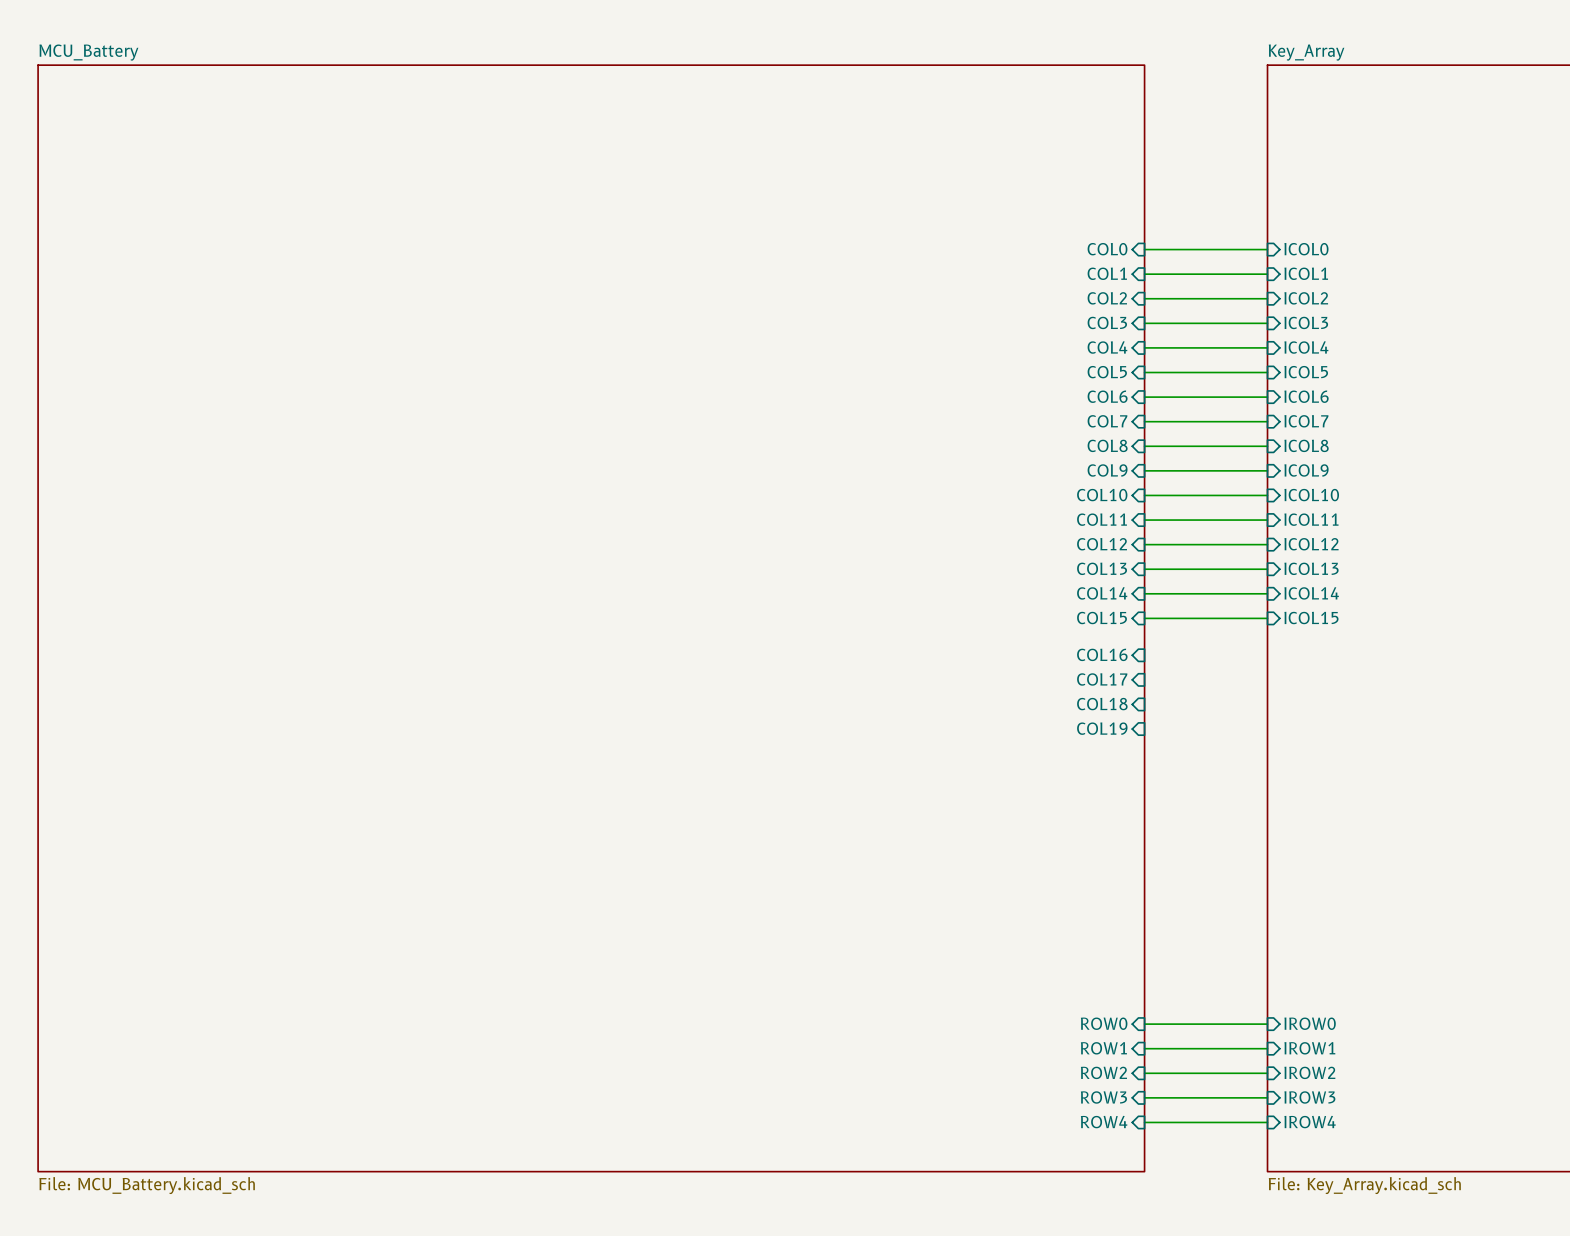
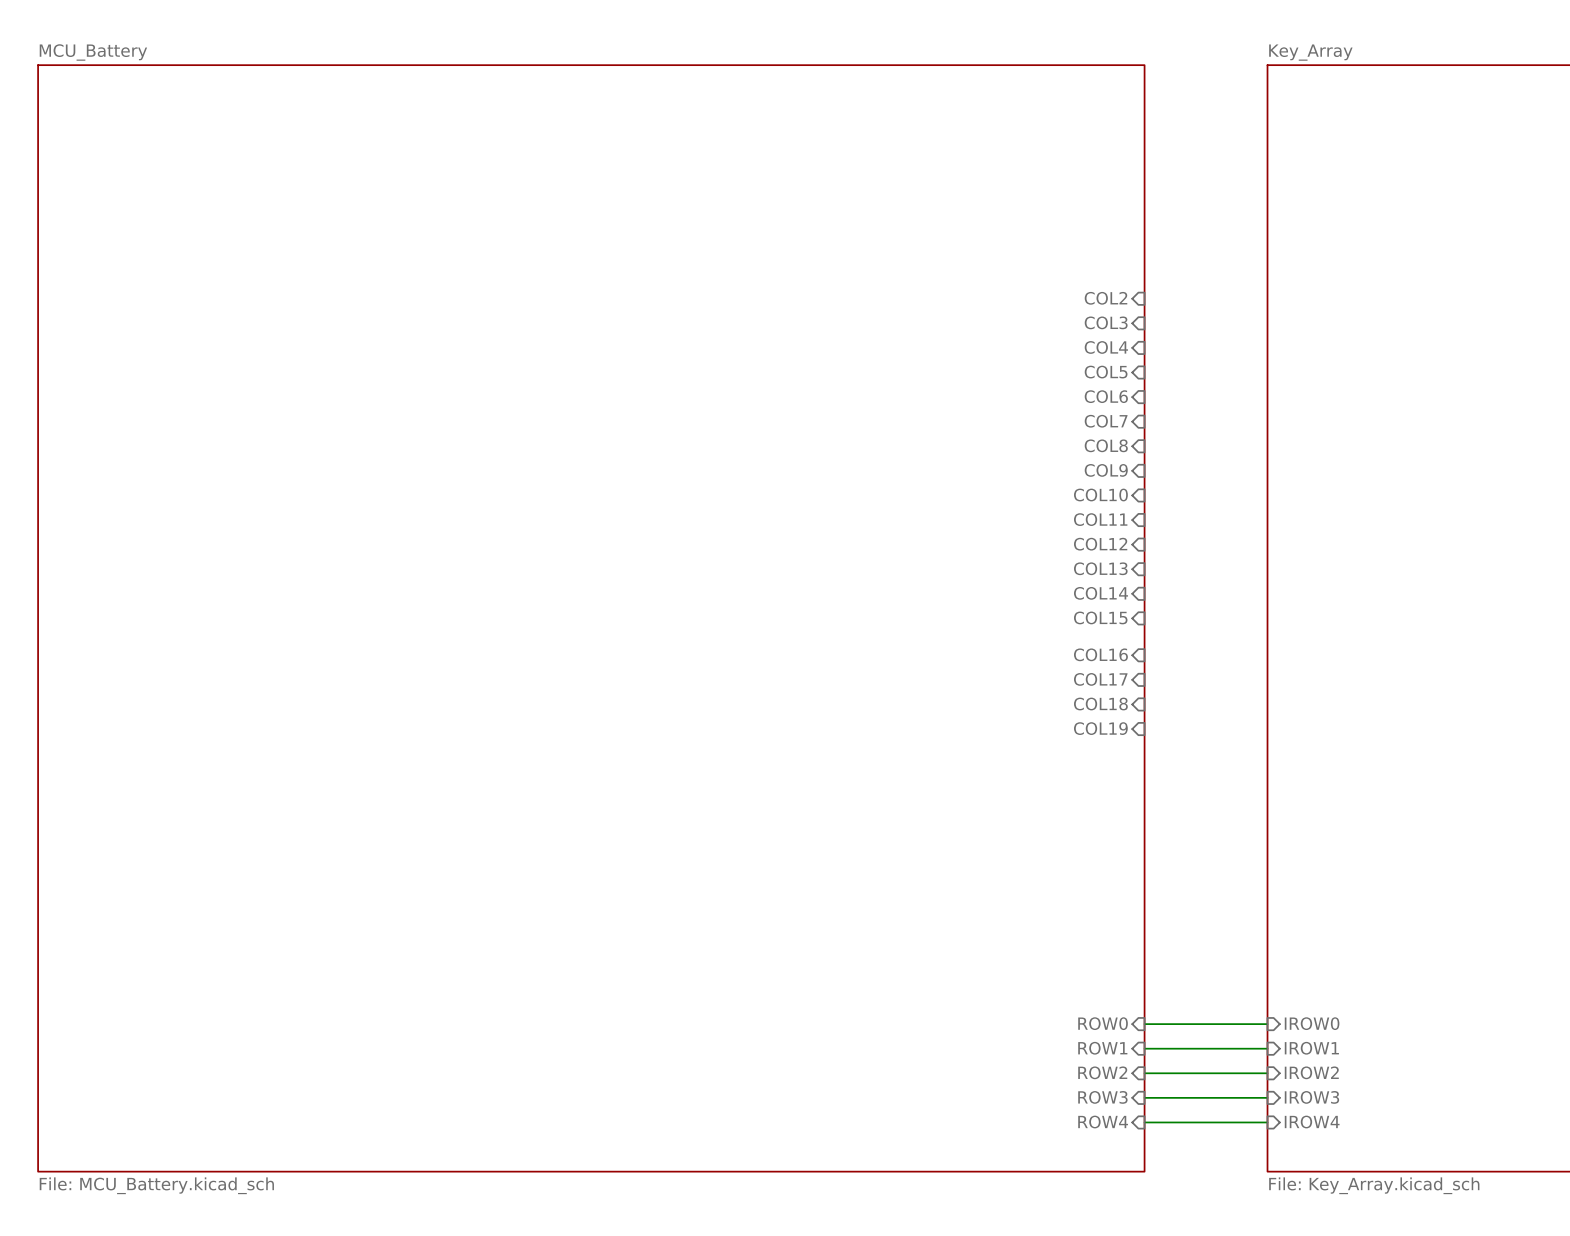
sheet pin: COL0 (1107, 249) -> none
wire: (1144, 249) (1267, 249) -> none
sheet pin: ICOL0 (1306, 249) -> none
sheet pin: COL1 (1107, 273) -> none
sheet pin: ICOL1 (1306, 273) -> none
wire: (1144, 274) (1267, 274) -> none
wire: (1144, 298) (1267, 298) -> none
sheet pin: ICOL2 (1306, 298) -> none
sheet pin: ICOL3 (1306, 322) -> none
wire: (1144, 323) (1267, 323) -> none
wire: (1144, 347) (1267, 347) -> none
sheet pin: ICOL4 (1306, 347) -> none
wire: (1144, 372) (1267, 372) -> none
sheet pin: ICOL5 (1306, 372) -> none
sheet pin: ICOL6 (1306, 396) -> none
wire: (1144, 397) (1267, 397) -> none
wire: (1144, 421) (1267, 421) -> none
sheet pin: ICOL7 (1306, 421) -> none
sheet pin: ICOL8 (1306, 445) -> none
wire: (1144, 446) (1267, 446) -> none
wire: (1144, 470) (1267, 470) -> none
sheet pin: ICOL9 (1306, 470) -> none
wire: (1144, 495) (1267, 495) -> none
sheet pin: ICOL10 (1311, 495) -> none
sheet pin: ICOL11 (1311, 519) -> none
wire: (1144, 520) (1267, 520) -> none
wire: (1144, 544) (1267, 544) -> none
sheet pin: ICOL12 (1311, 544) -> none
sheet pin: ICOL13 (1311, 568) -> none
wire: (1144, 569) (1267, 569) -> none
wire: (1144, 593) (1267, 593) -> none
sheet pin: ICOL14 (1311, 593) -> none
wire: (1144, 618) (1267, 618) -> none
sheet pin: ICOL15 (1311, 618) -> none

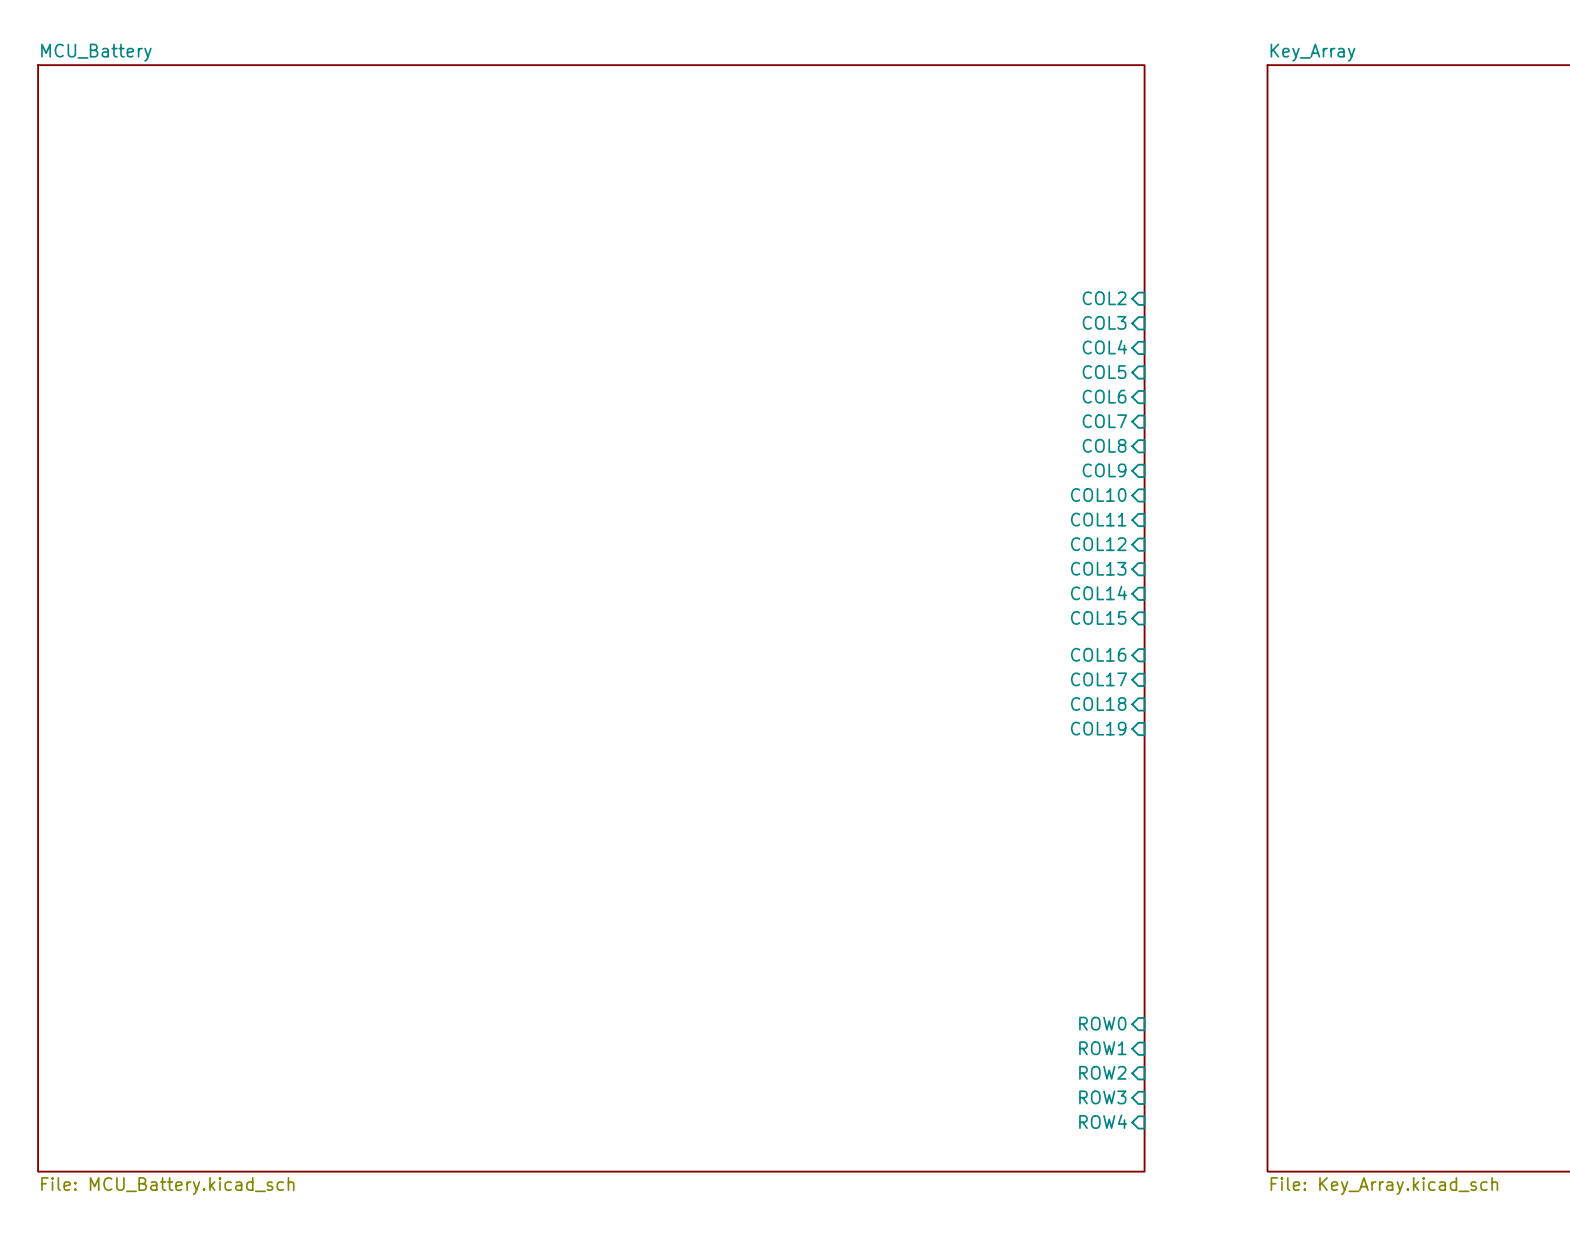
sheet pin: IROW0 (1312, 1023) -> none
wire: (1144, 1024) (1267, 1024) -> none
wire: (1144, 1048) (1267, 1048) -> none
sheet pin: IROW1 (1311, 1048) -> none
sheet pin: IROW2 (1311, 1072) -> none
wire: (1144, 1073) (1267, 1073) -> none
wire: (1144, 1097) (1267, 1097) -> none
sheet pin: IROW3 (1311, 1097) -> none
wire: (1144, 1122) (1267, 1122) -> none
sheet pin: IROW4 (1312, 1122) -> none

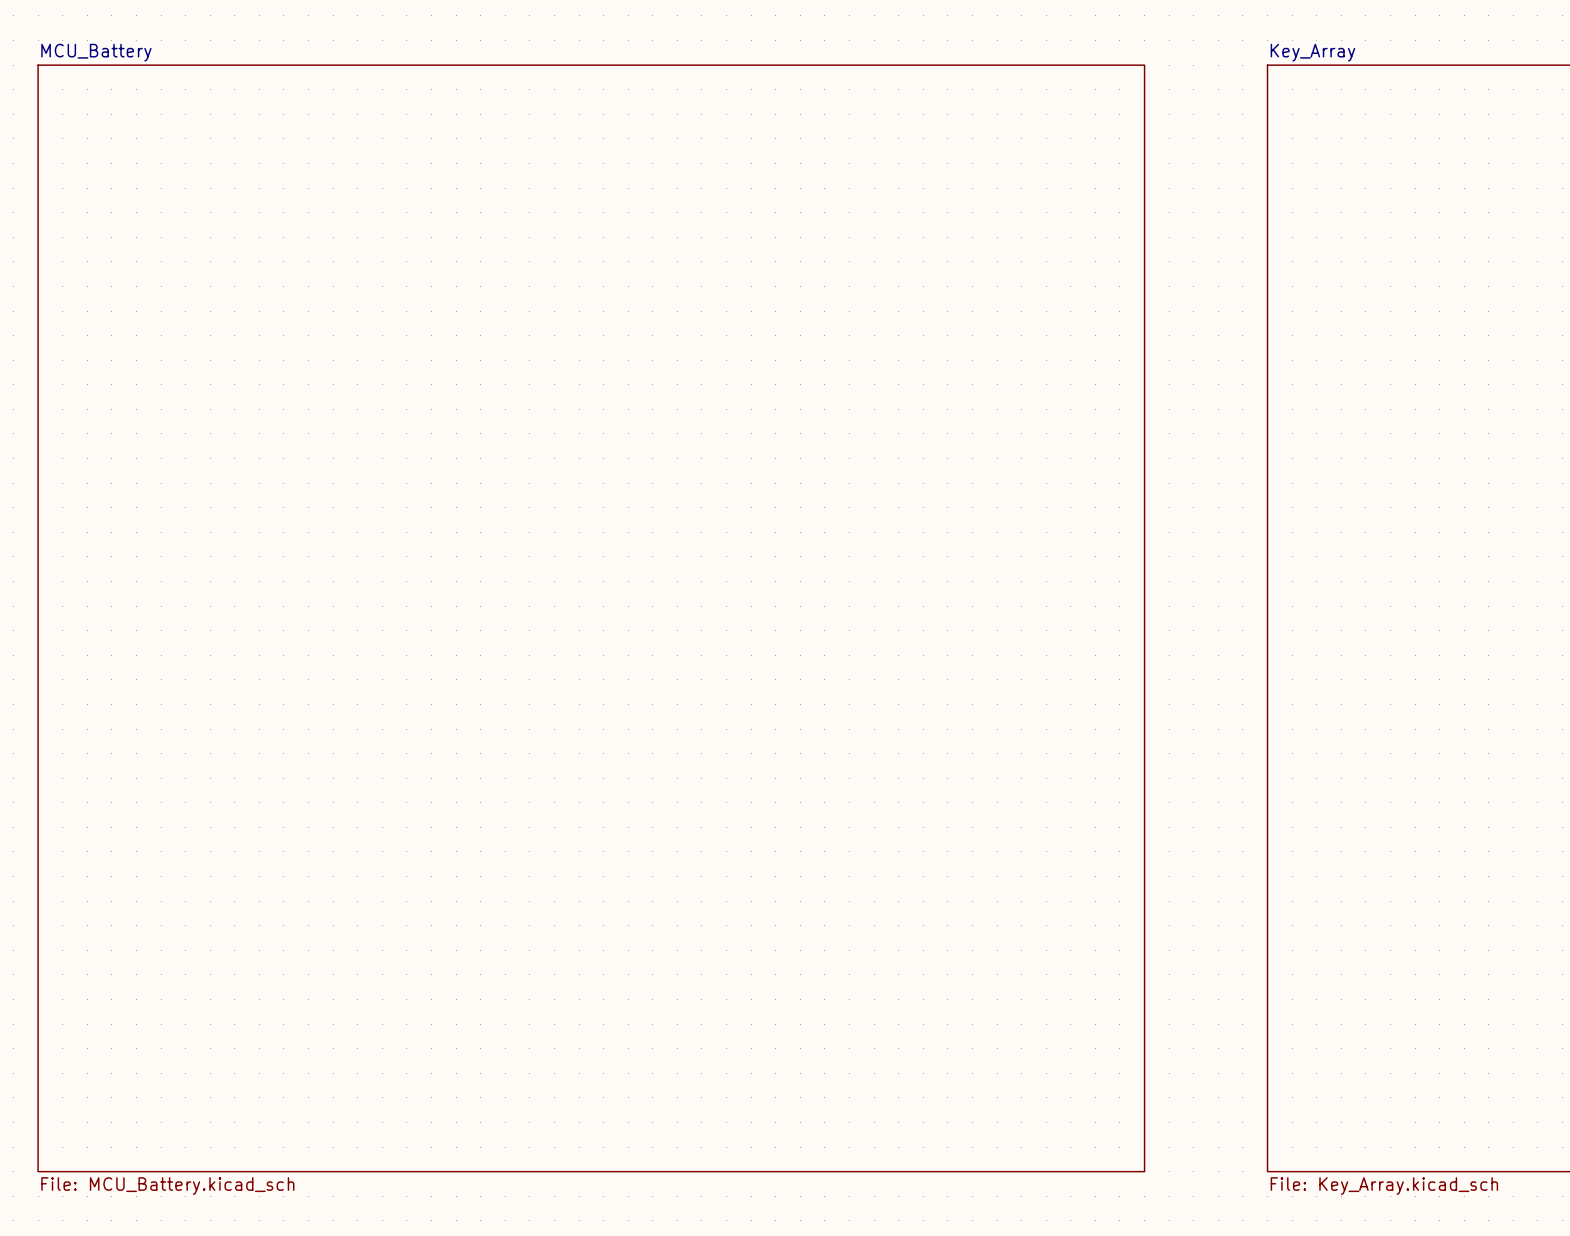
sheet pin: COL2 (1104, 298) -> none
sheet pin: COL3 (1104, 322) -> none
sheet pin: COL4 (1104, 347) -> none
sheet pin: COL5 (1104, 372) -> none
sheet pin: COL6 (1104, 396) -> none
sheet pin: COL7 (1104, 421) -> none
sheet pin: COL8 (1104, 445) -> none
sheet pin: COL9 (1104, 470) -> none
sheet pin: COL10 (1098, 494) -> none
sheet pin: COL11 (1098, 519) -> none
sheet pin: COL12 (1098, 544) -> none
sheet pin: COL13 (1098, 568) -> none
sheet pin: COL14 (1099, 593) -> none
sheet pin: COL15 (1098, 617) -> none
sheet pin: COL16 (1098, 654) -> none
sheet pin: COL17 (1099, 679) -> none
sheet pin: COL18 (1098, 703) -> none
sheet pin: COL19 (1098, 728) -> none
sheet pin: ROW0 (1102, 1023) -> none
sheet pin: ROW1 (1102, 1048) -> none
sheet pin: ROW2 (1102, 1072) -> none
sheet pin: ROW3 (1102, 1097) -> none
sheet pin: ROW4 (1103, 1121) -> none

